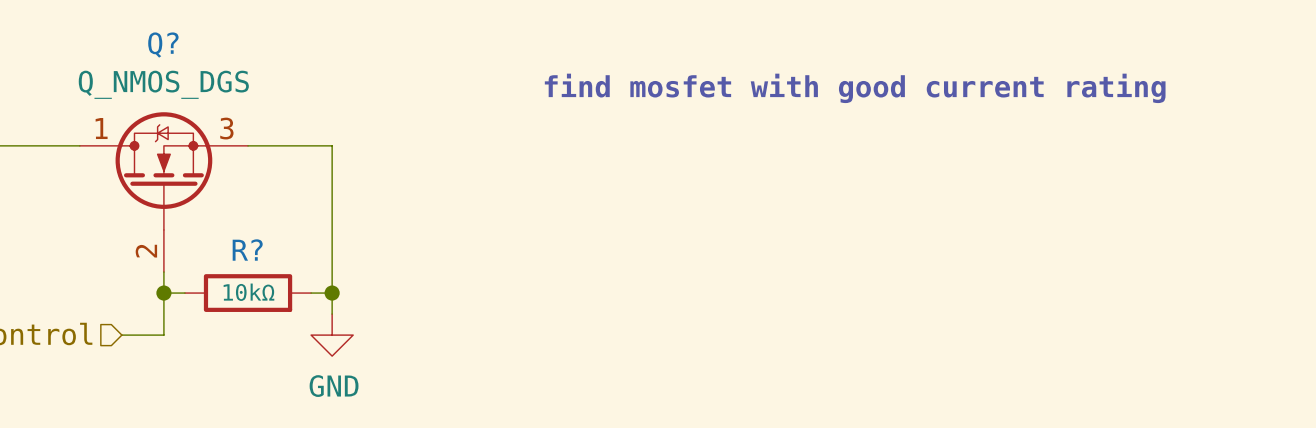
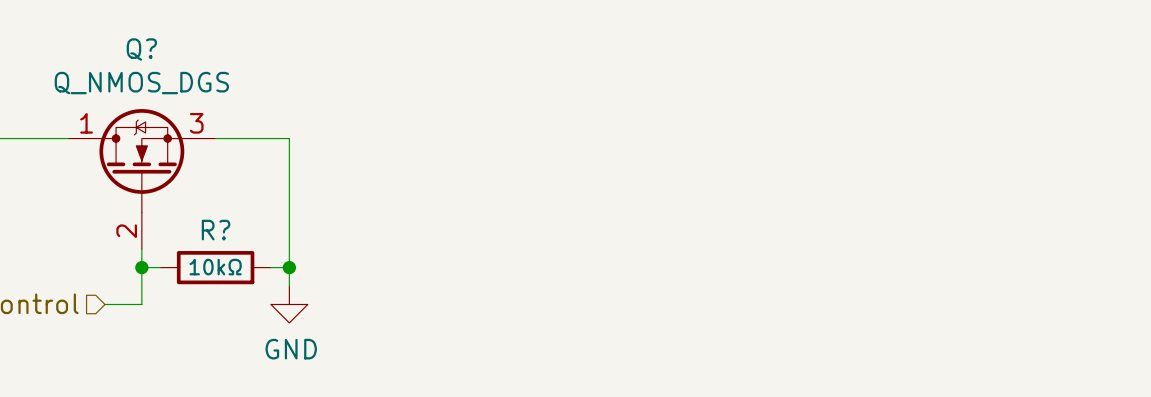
text: find mosfet with good current rating (855, 88) -> none

